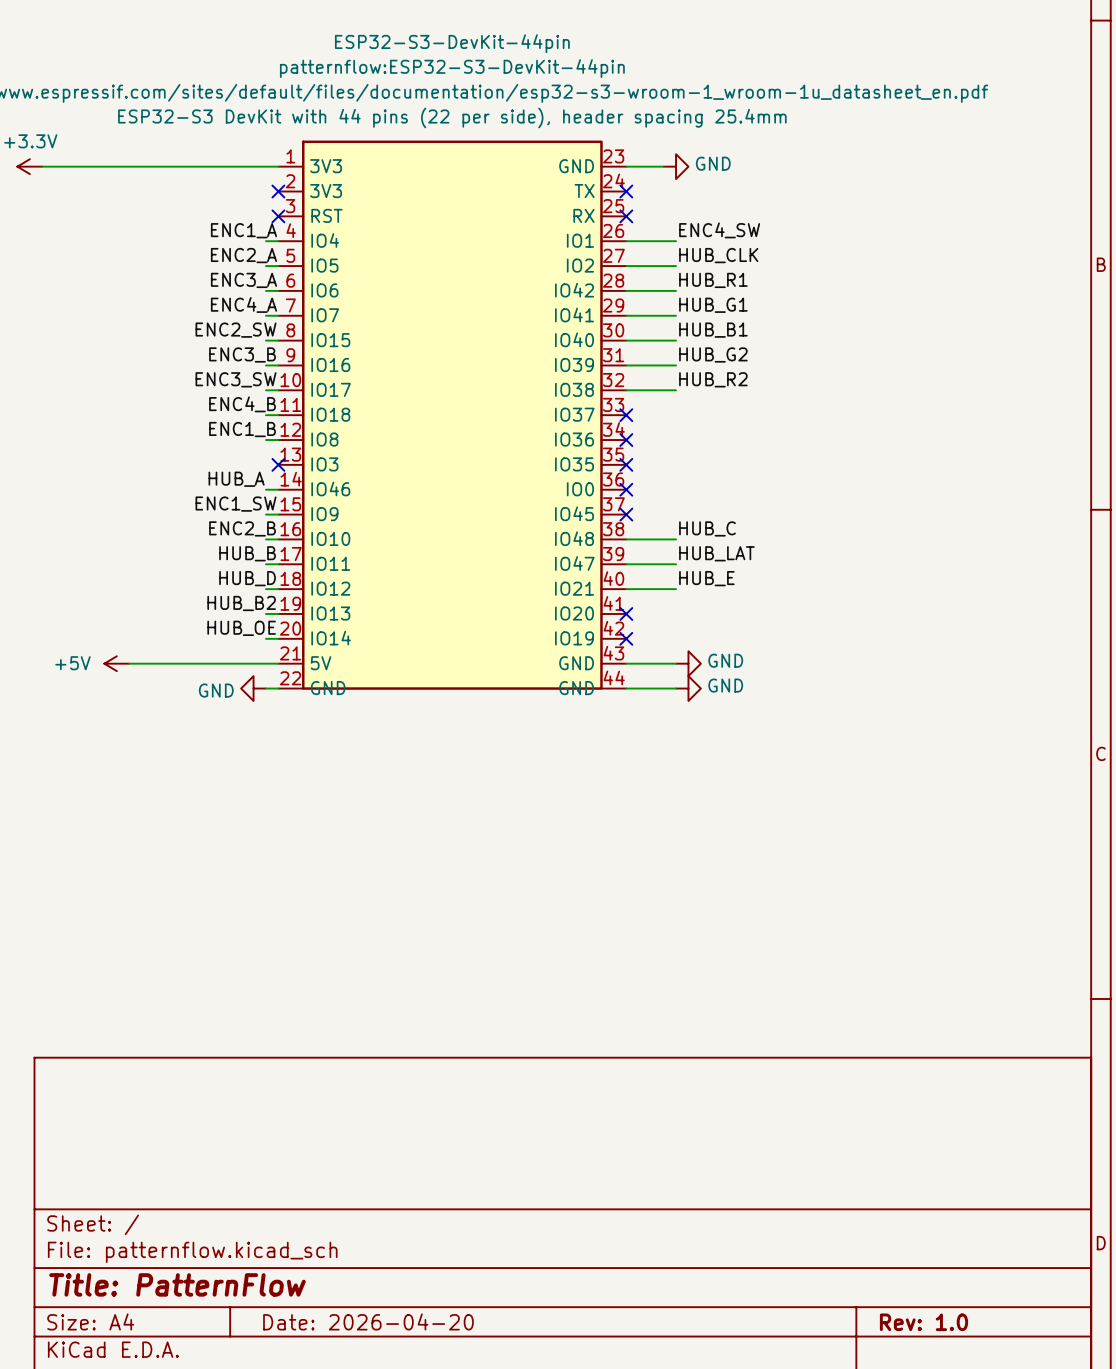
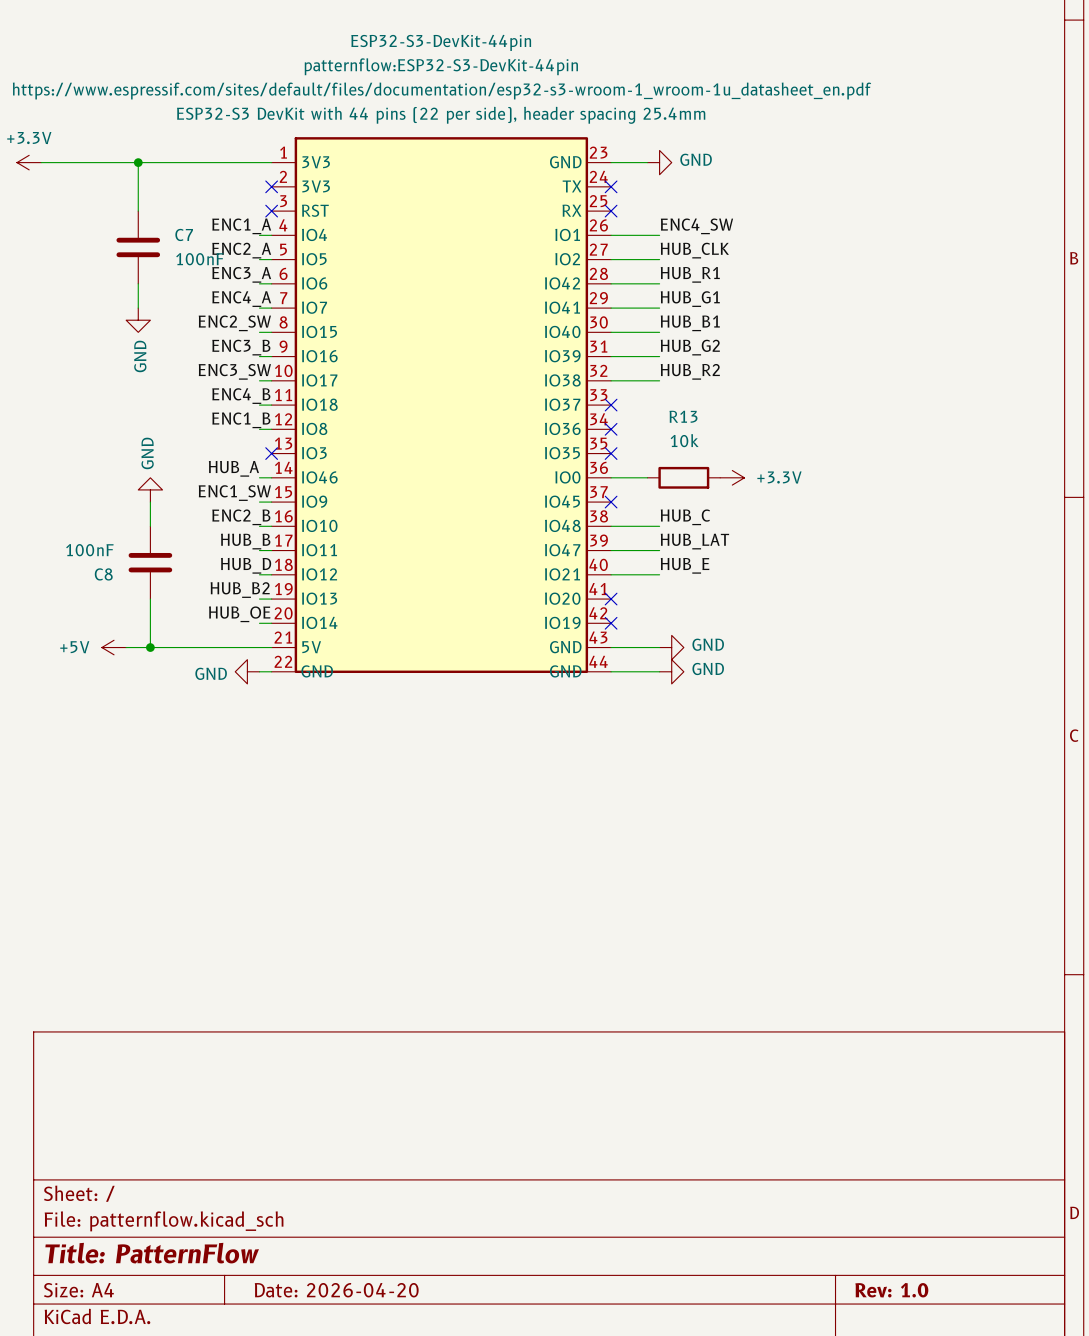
wire: none -> (138, 162) (138, 211)
junction: none -> (138, 162)
C7: none -> 100nF (138, 247)
wire: none -> (138, 283) (138, 308)
power symbol: none -> GND (138, 320)
wire: none -> (611, 477) (647, 477)
no-connect mark: (626, 489) -> none
R13: none -> 10k (683, 477)
power symbol: none -> +3.3V (732, 477)
power symbol: none -> GND (150, 489)
wire: none -> (150, 502) (150, 526)
C8: none -> 100nF (150, 562)
wire: none -> (150, 599) (150, 647)
junction: none -> (150, 647)

